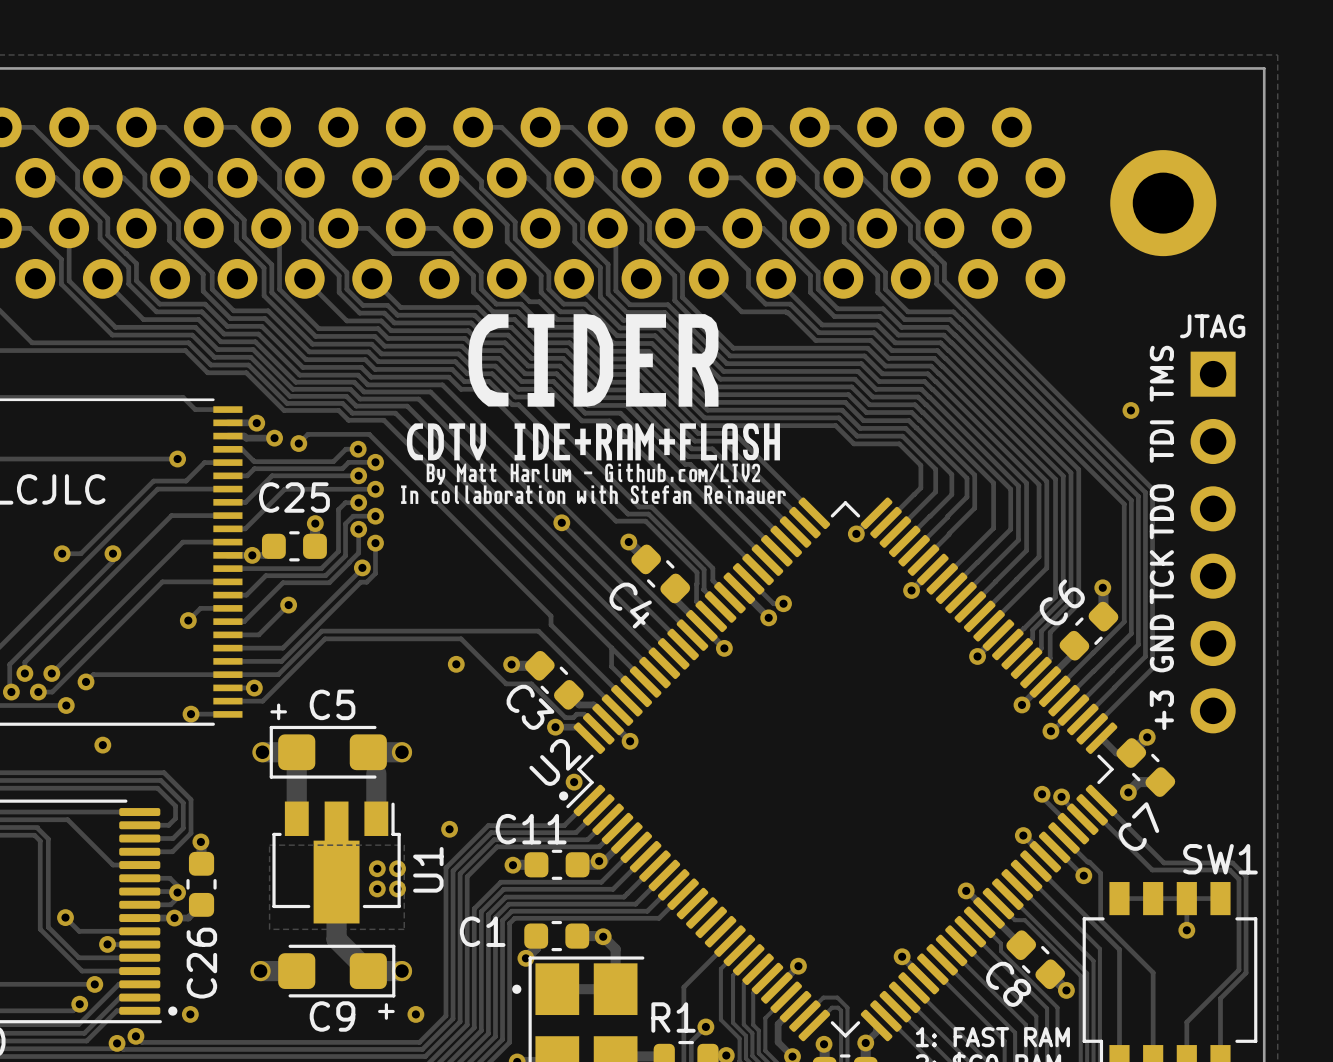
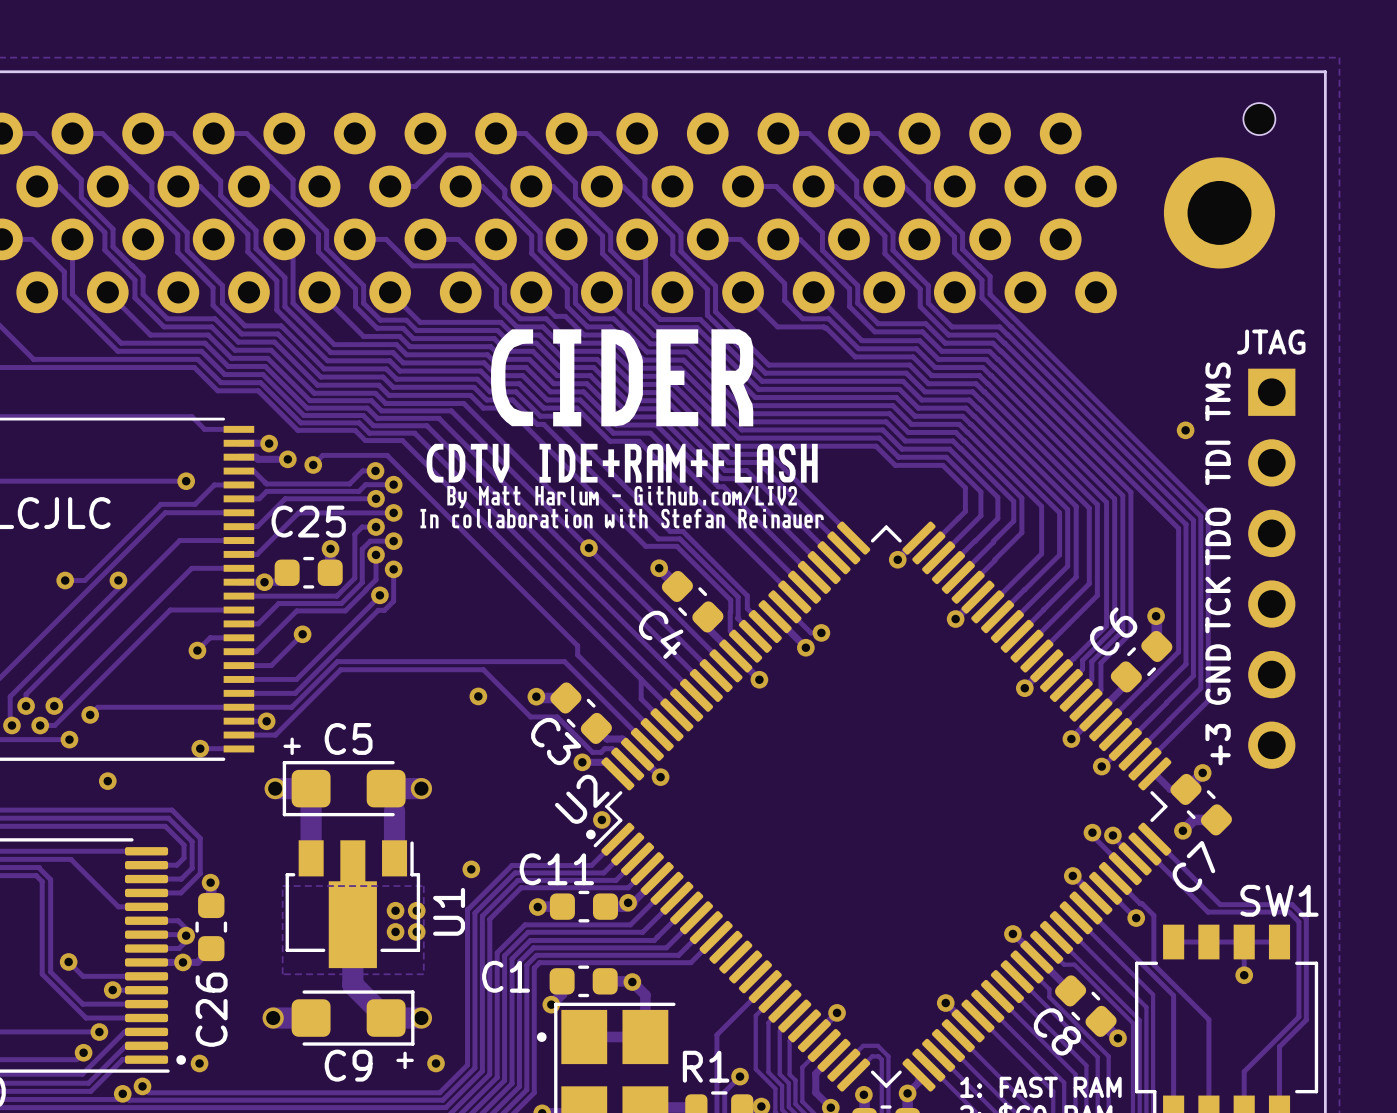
part: none -> (1259, 119)

